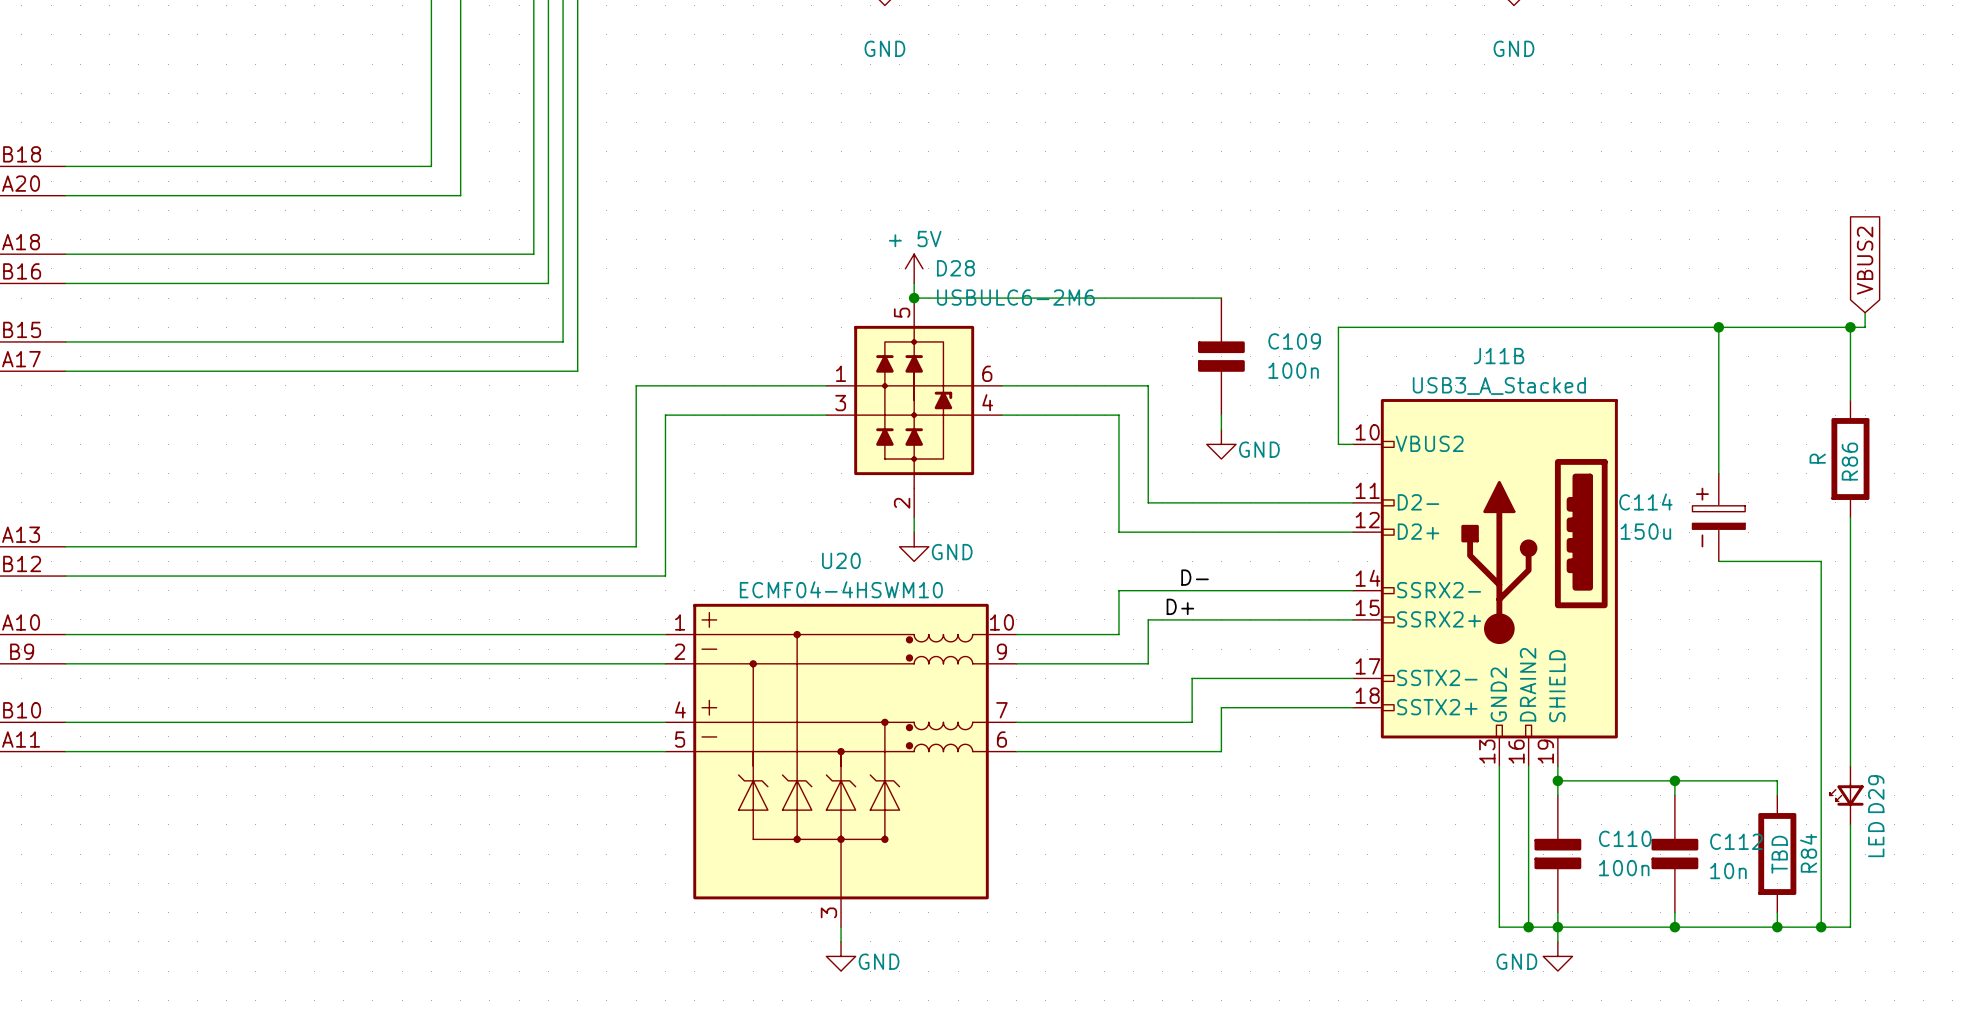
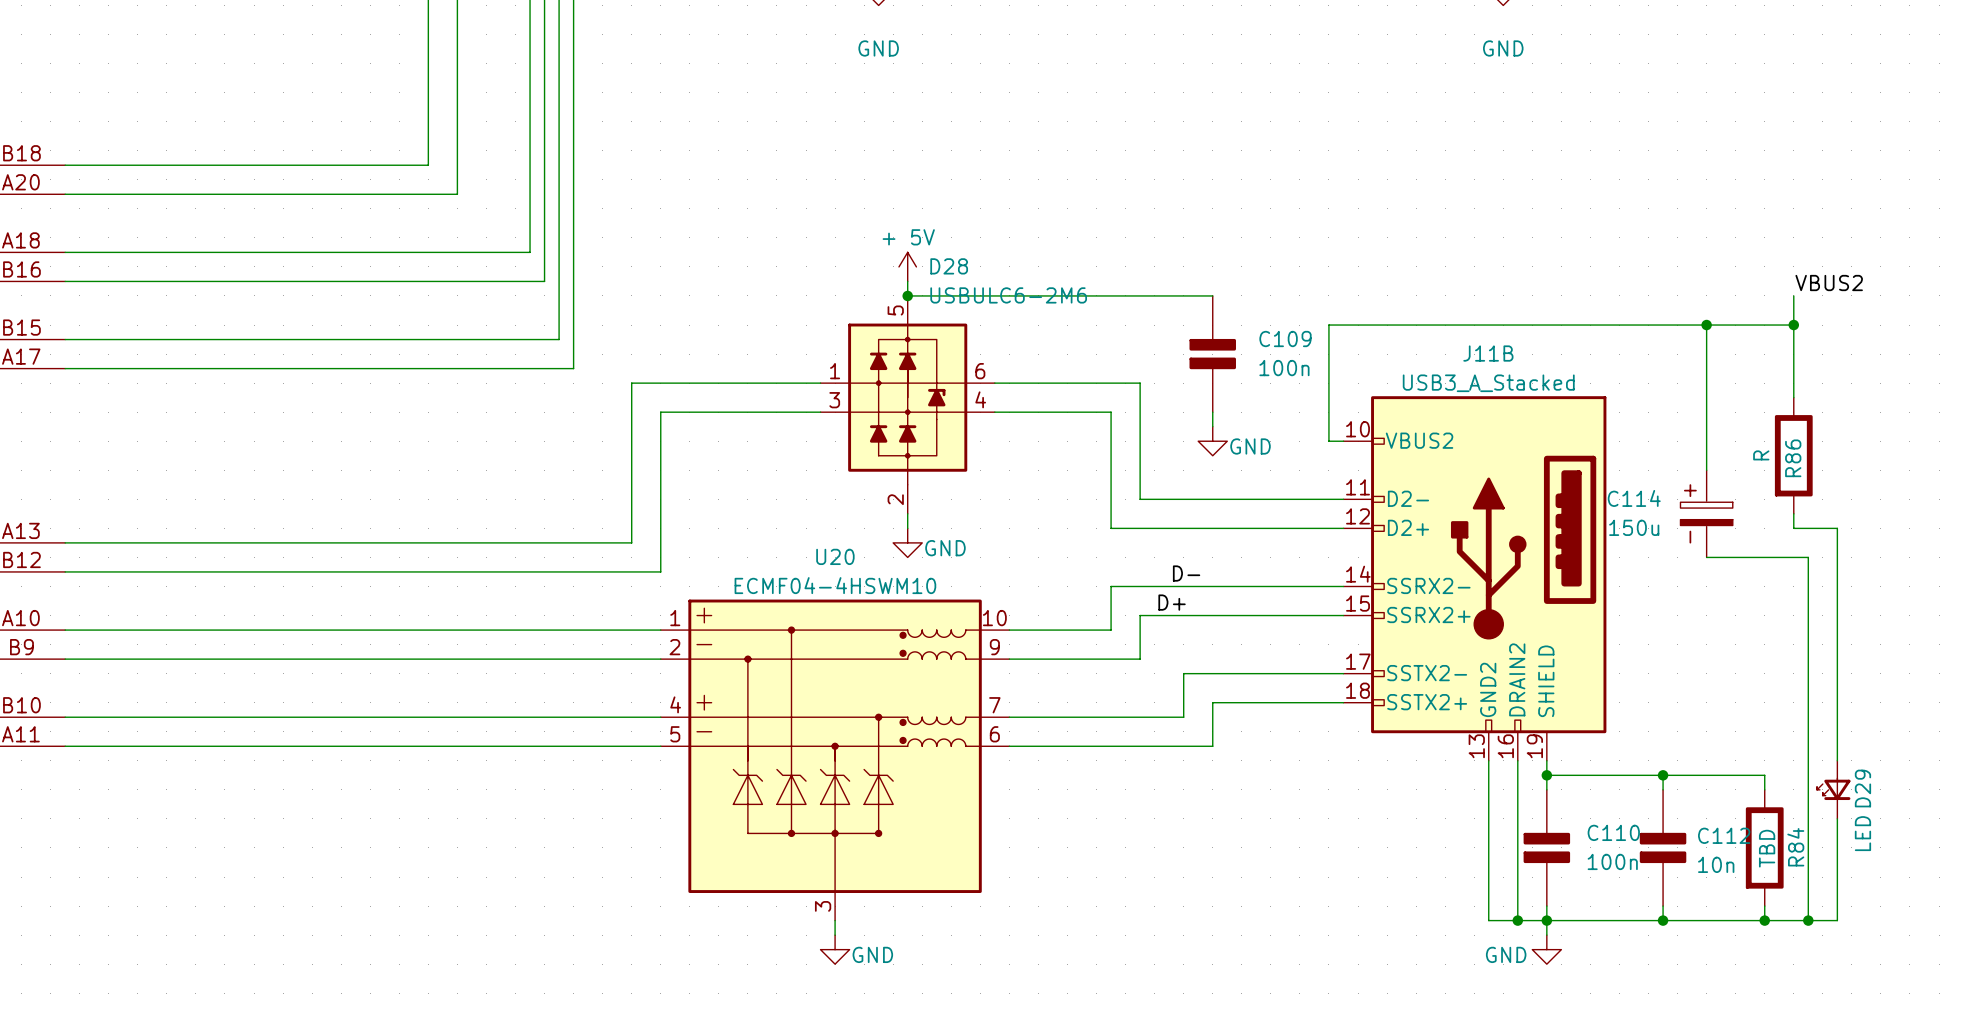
global label: VBUS2 (1865, 260) -> none
label: none -> VBUS2 (1829, 283)
wire: none -> (1793, 295) (1793, 397)
wire: (1865, 312) (1865, 327) (1806, 327) -> none
wire: (1850, 327) (1850, 400) -> none
junction position: (1850, 327) -> (1793, 325)
R86 position: (1850, 459) -> (1793, 455)
wire: (1850, 517) (1850, 532) -> (1793, 513) (1793, 528) (1837, 528)

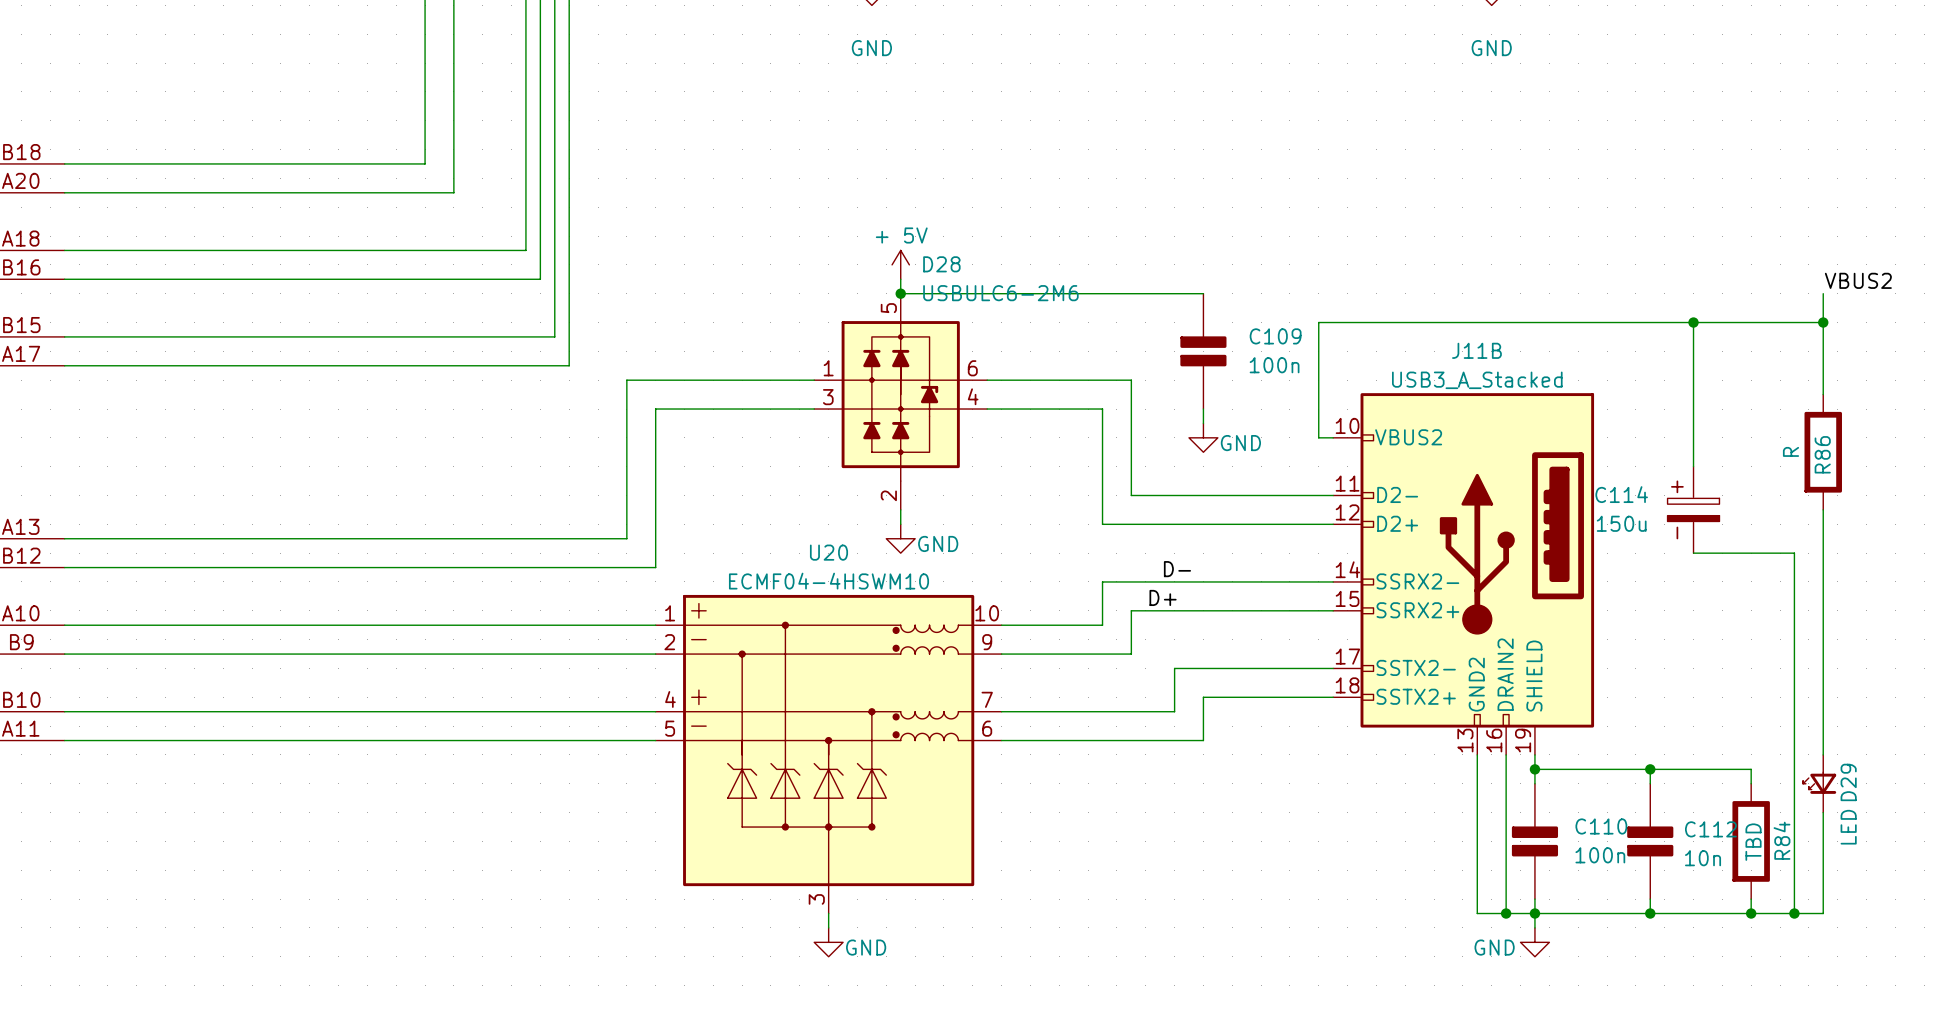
label position: VBUS2 (1829, 283) -> VBUS2 (1858, 280)
wire: (1793, 295) (1793, 397) -> (1823, 293) (1823, 394)
wire: none -> (1780, 322) (1823, 322)
junction position: (1793, 325) -> (1823, 322)
R86 position: (1793, 455) -> (1823, 452)
wire: (1793, 513) (1793, 528) (1837, 528) -> (1823, 509) (1823, 524)

